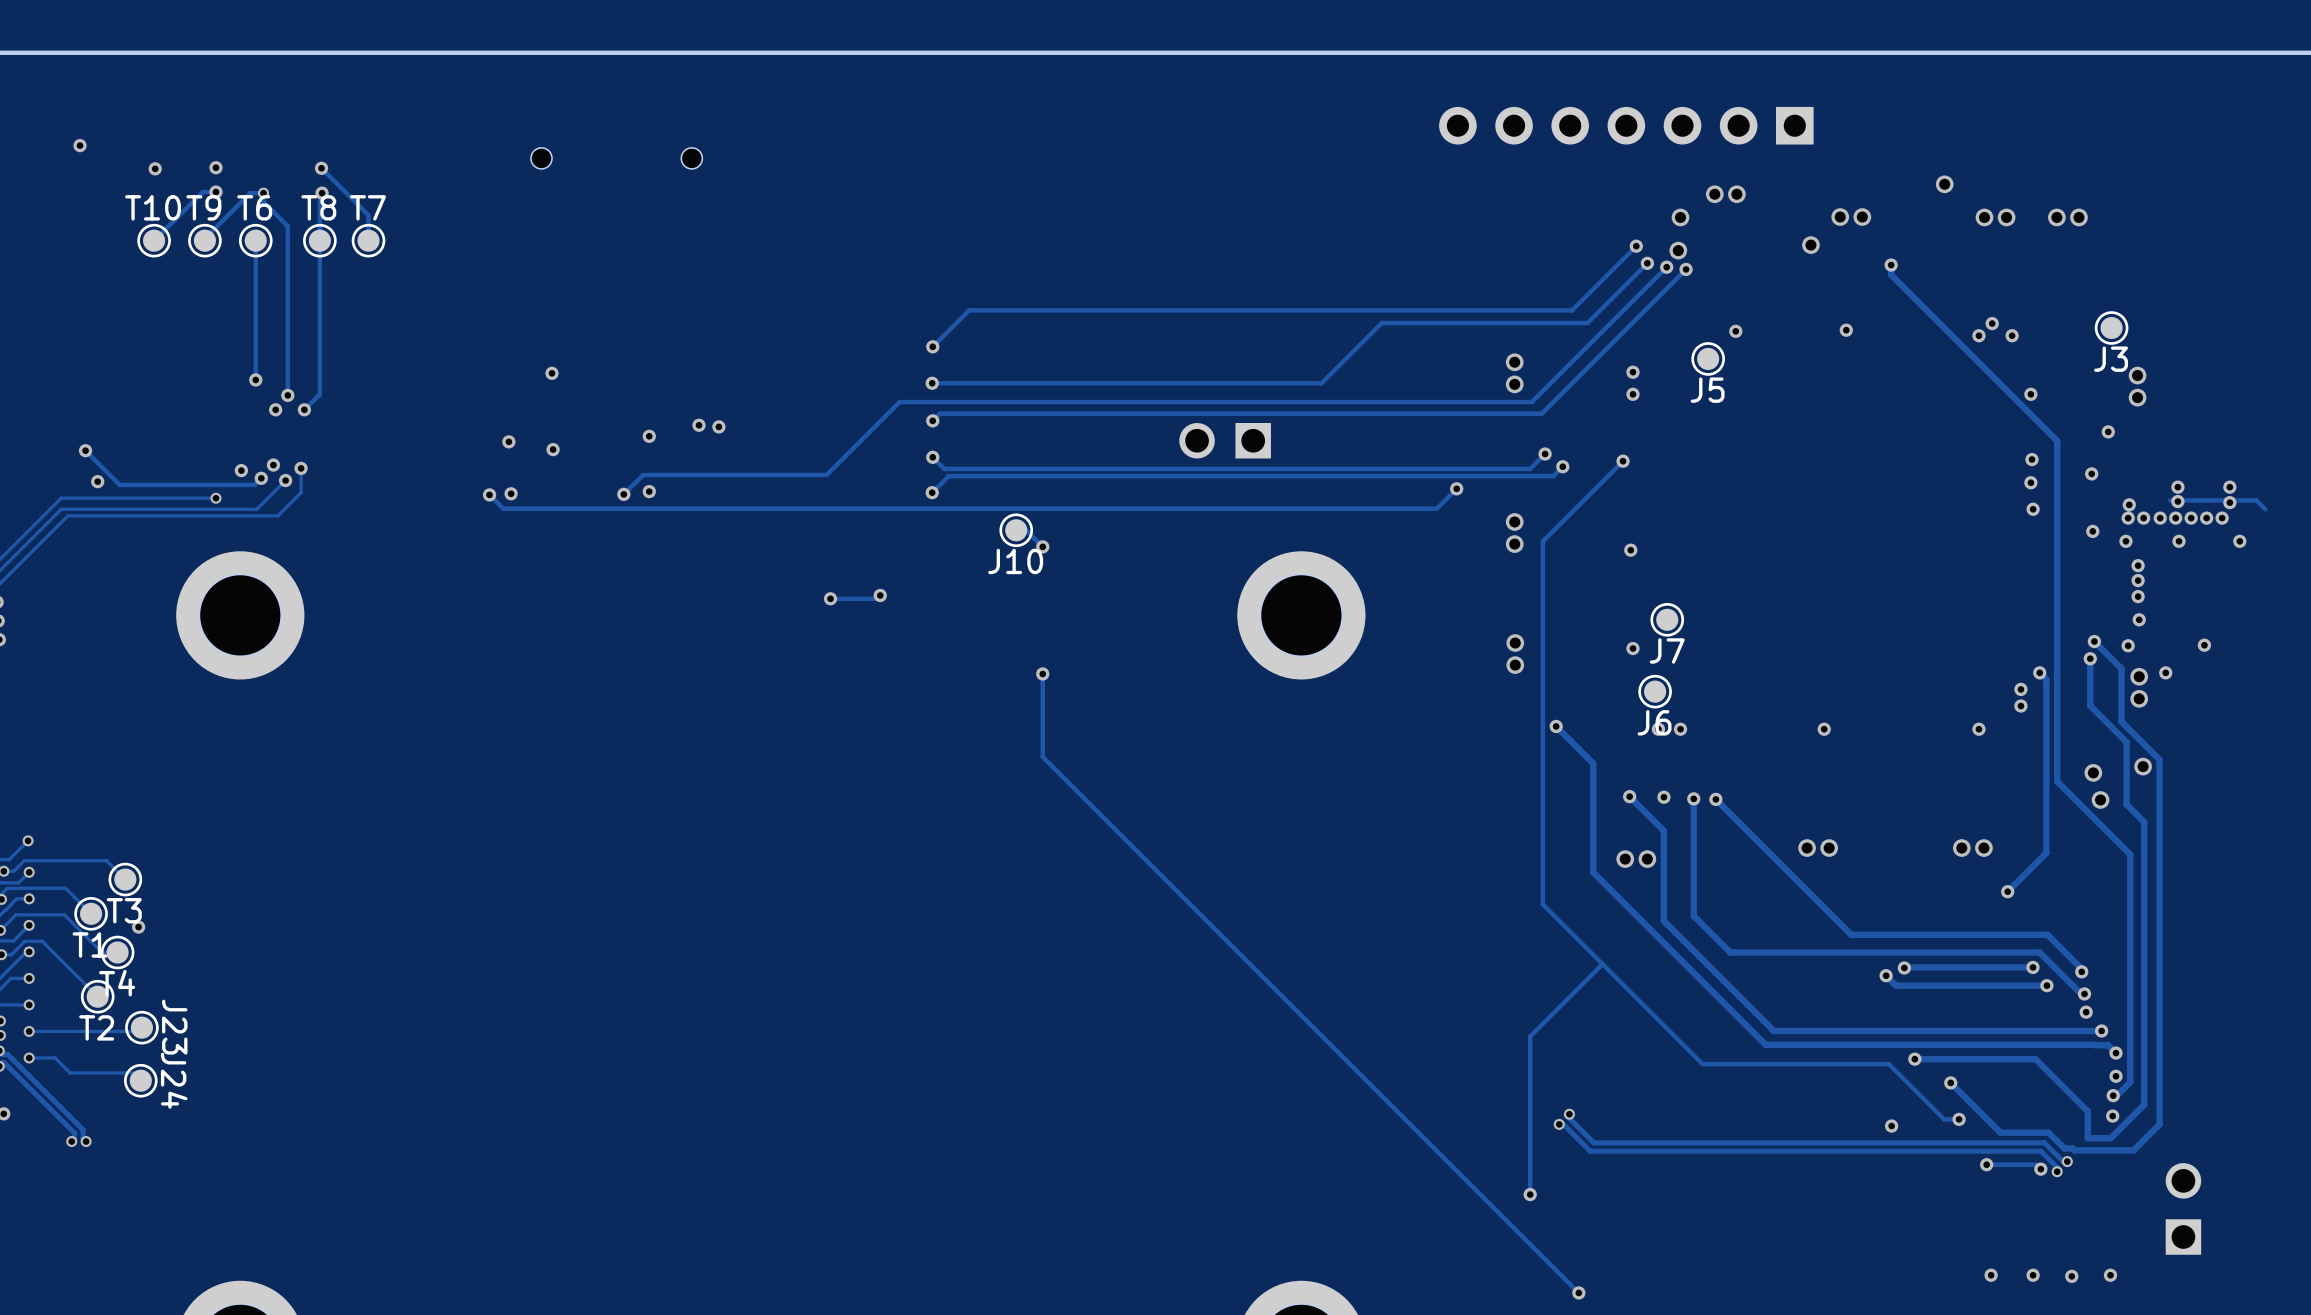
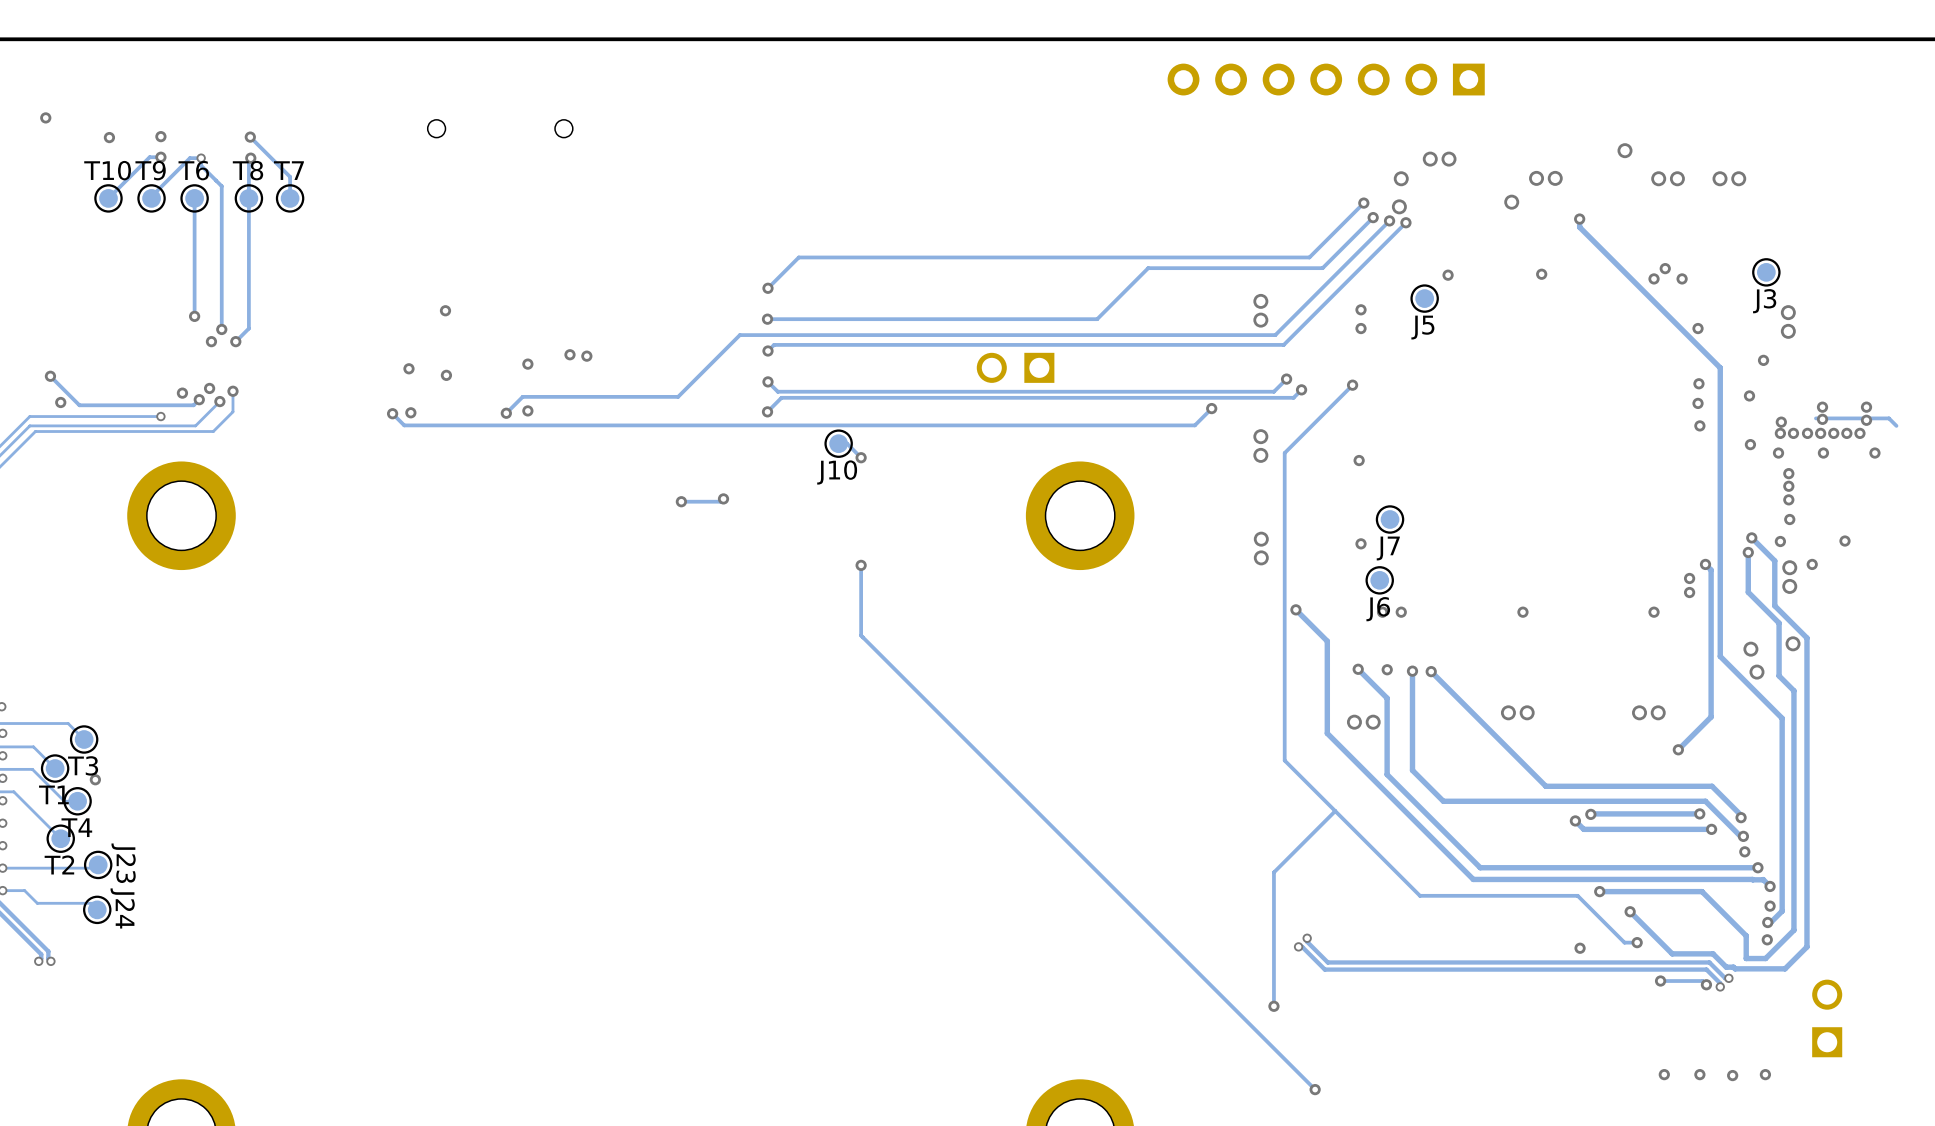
part position: (1626, 125) -> (1326, 79)

